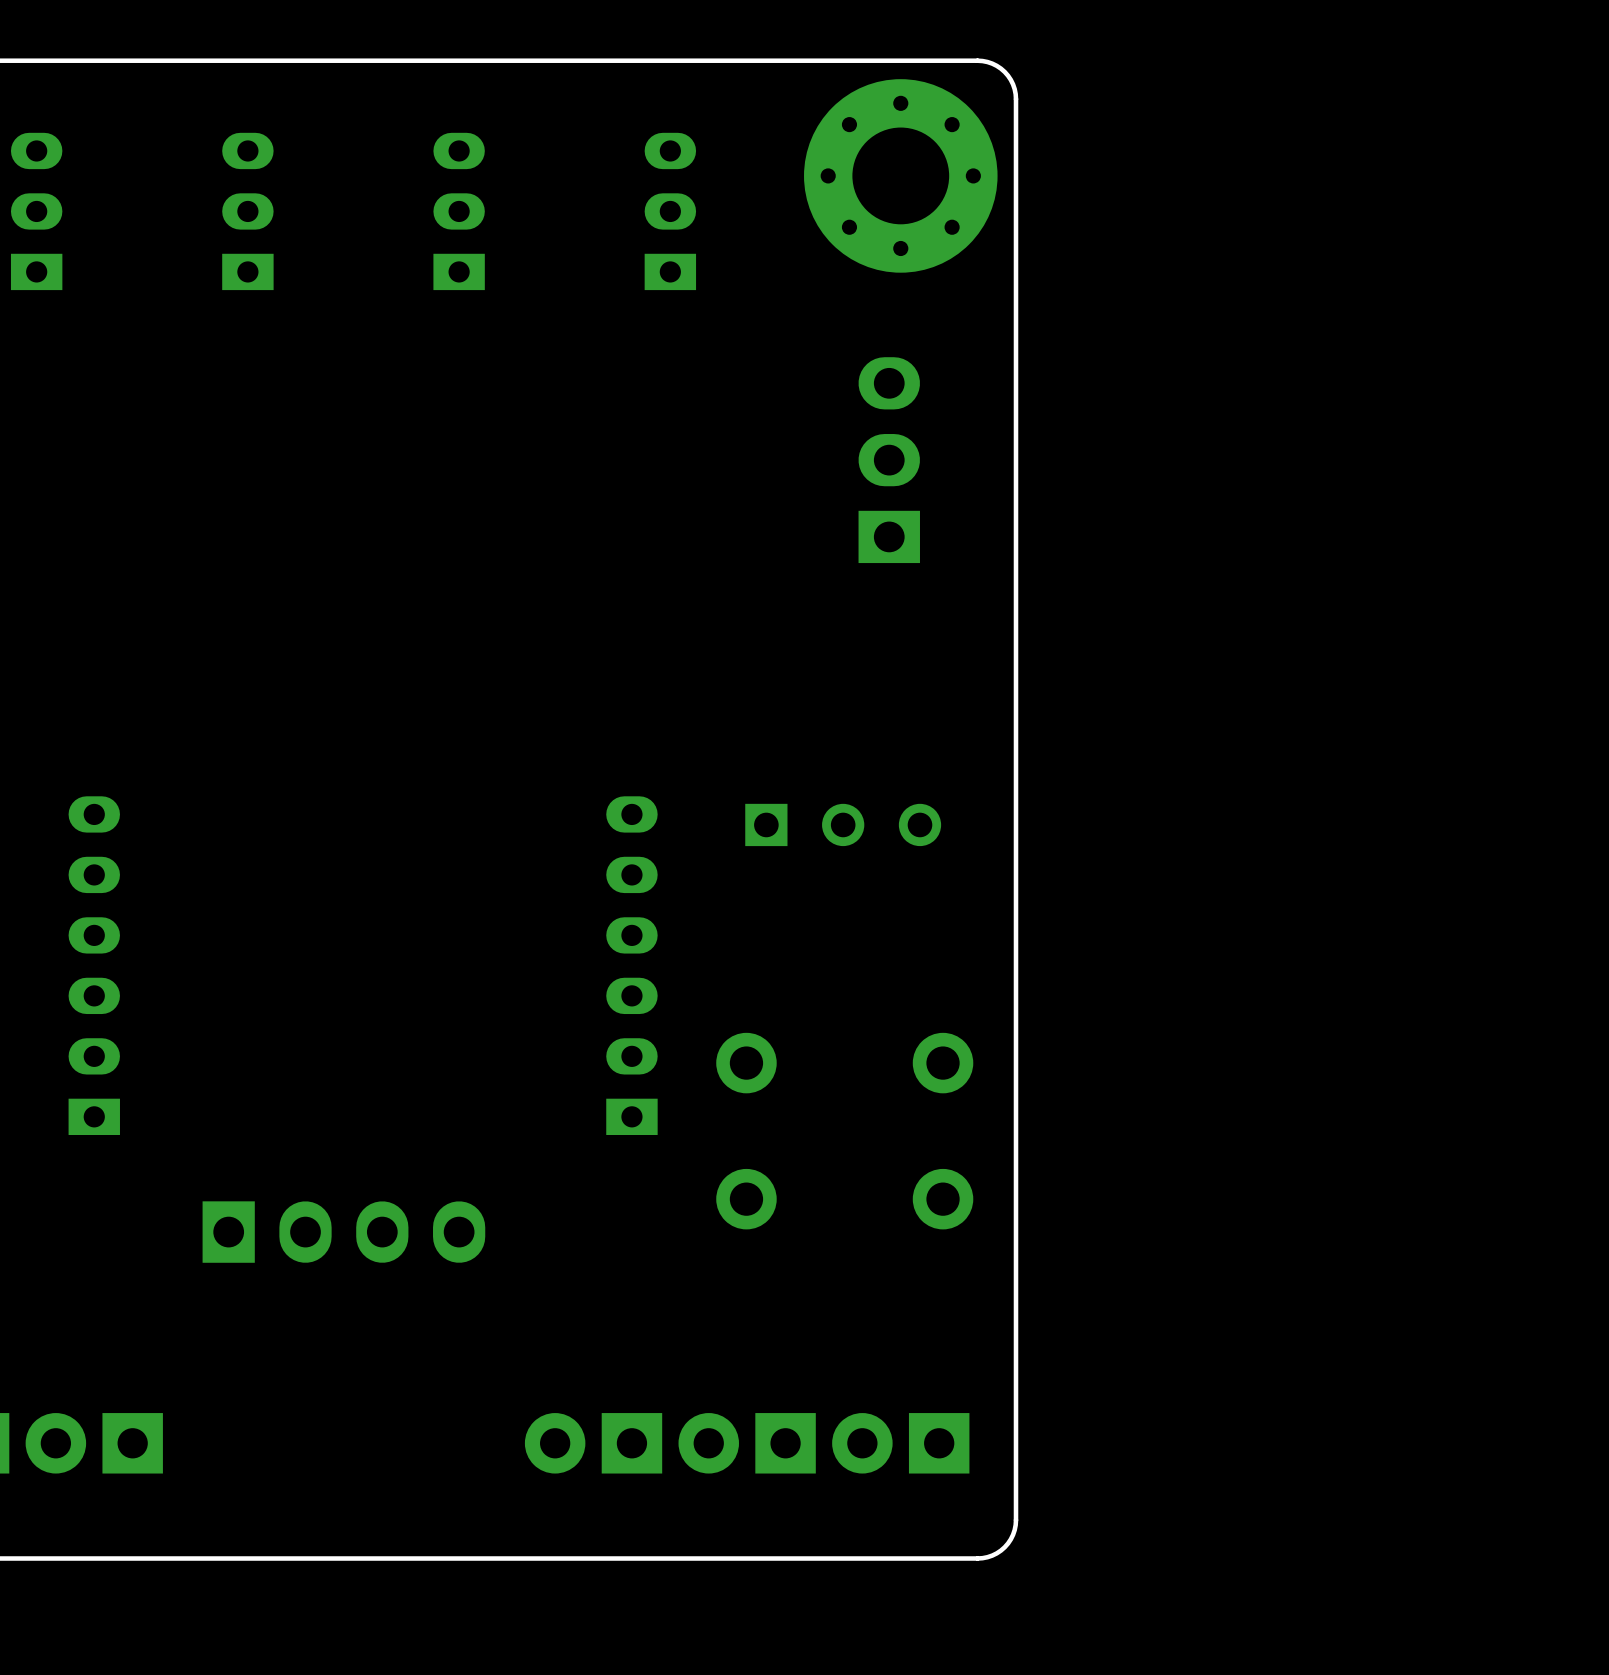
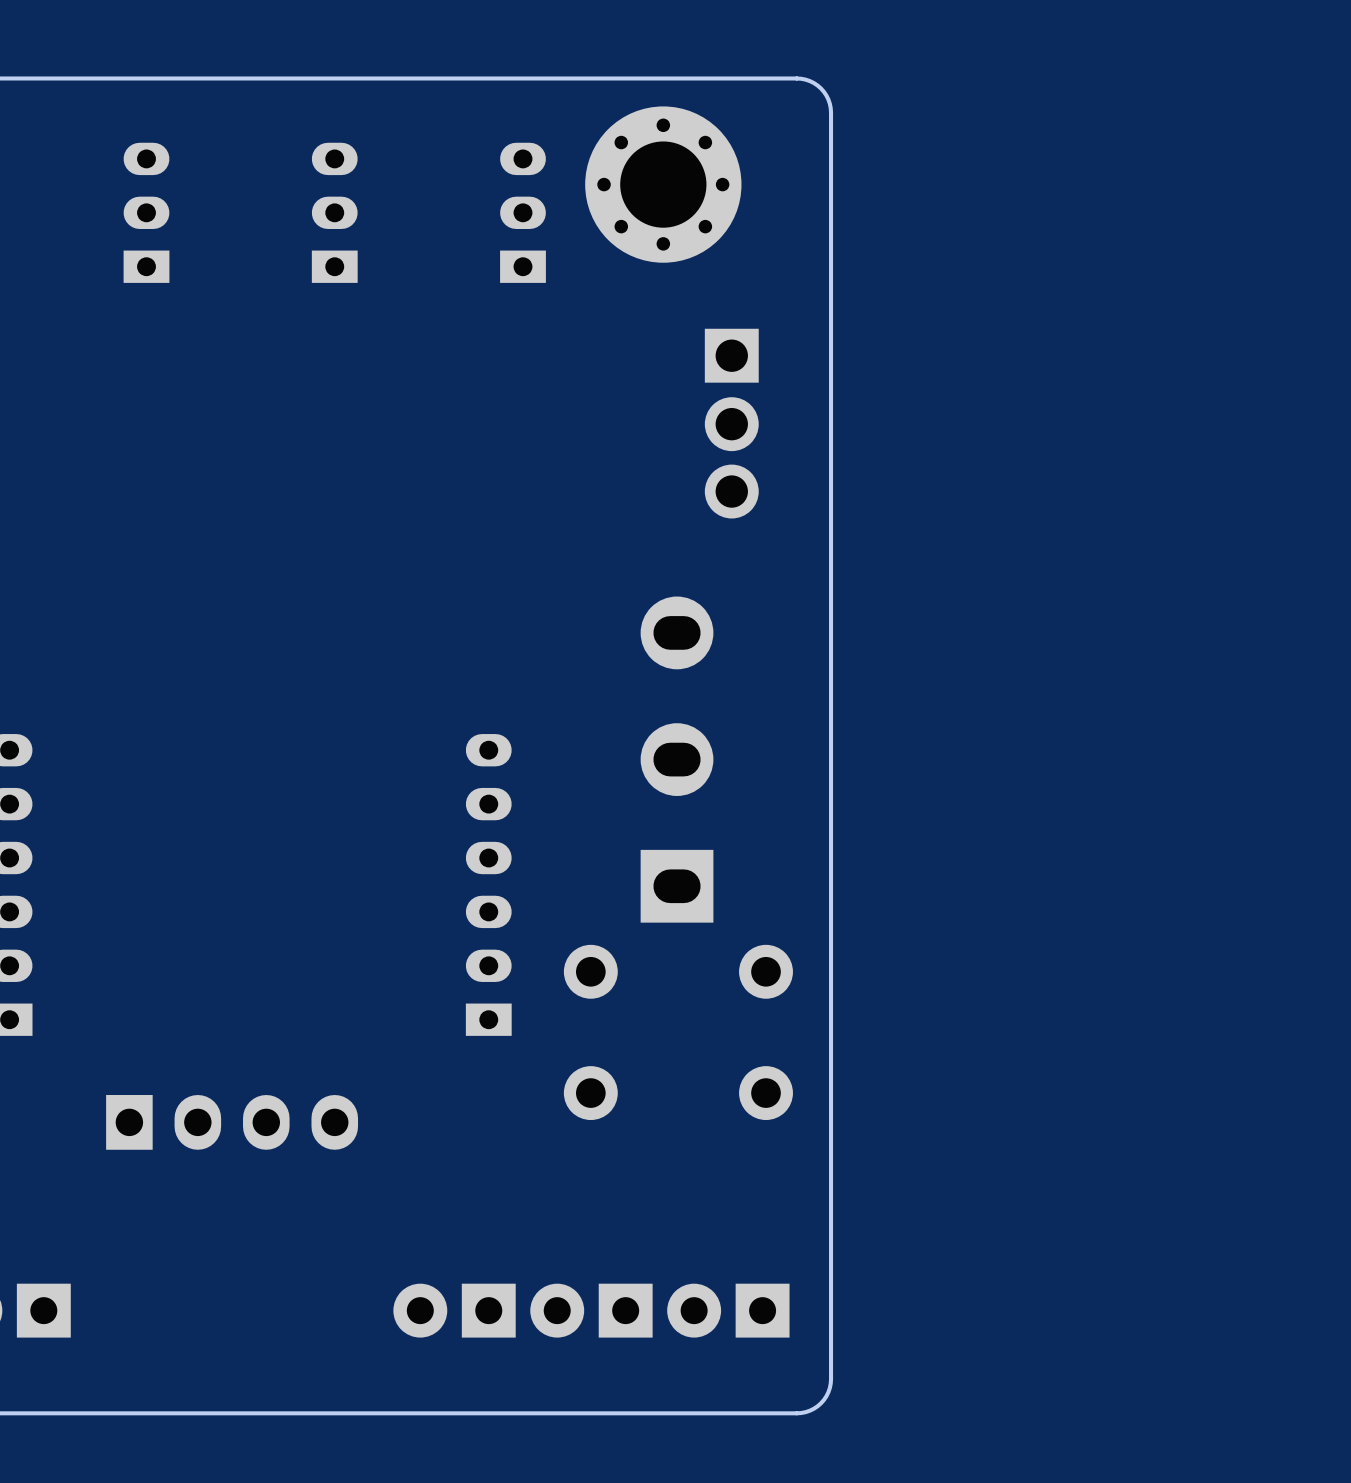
part: (900, 175) -> none
part: none -> (663, 184)
part footprint: [858, 357, 920, 564] -> [704, 328, 759, 519]
part footprint: [745, 803, 942, 847] -> [640, 596, 714, 923]

